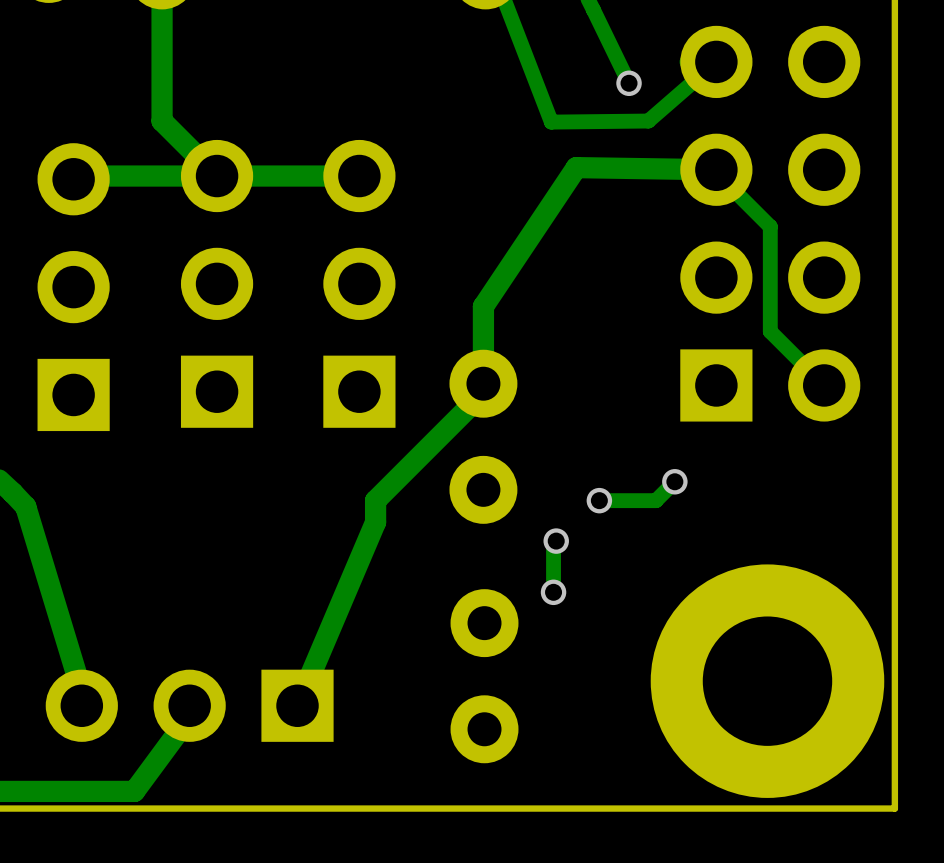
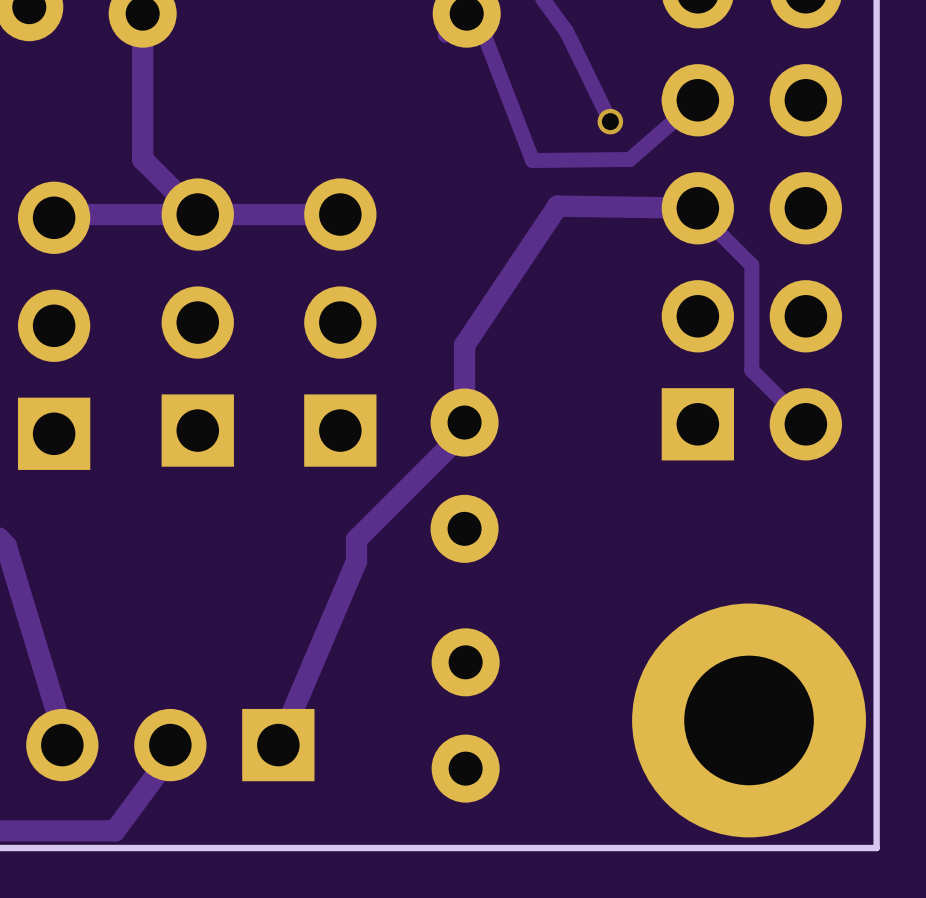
track: (674, 481) (655, 500) (599, 500) -> none
via: (674, 481) -> none
via: (599, 500) -> none
track: (556, 541) (553, 543) (553, 592) -> none
via: (556, 541) -> none
via: (553, 592) -> none

